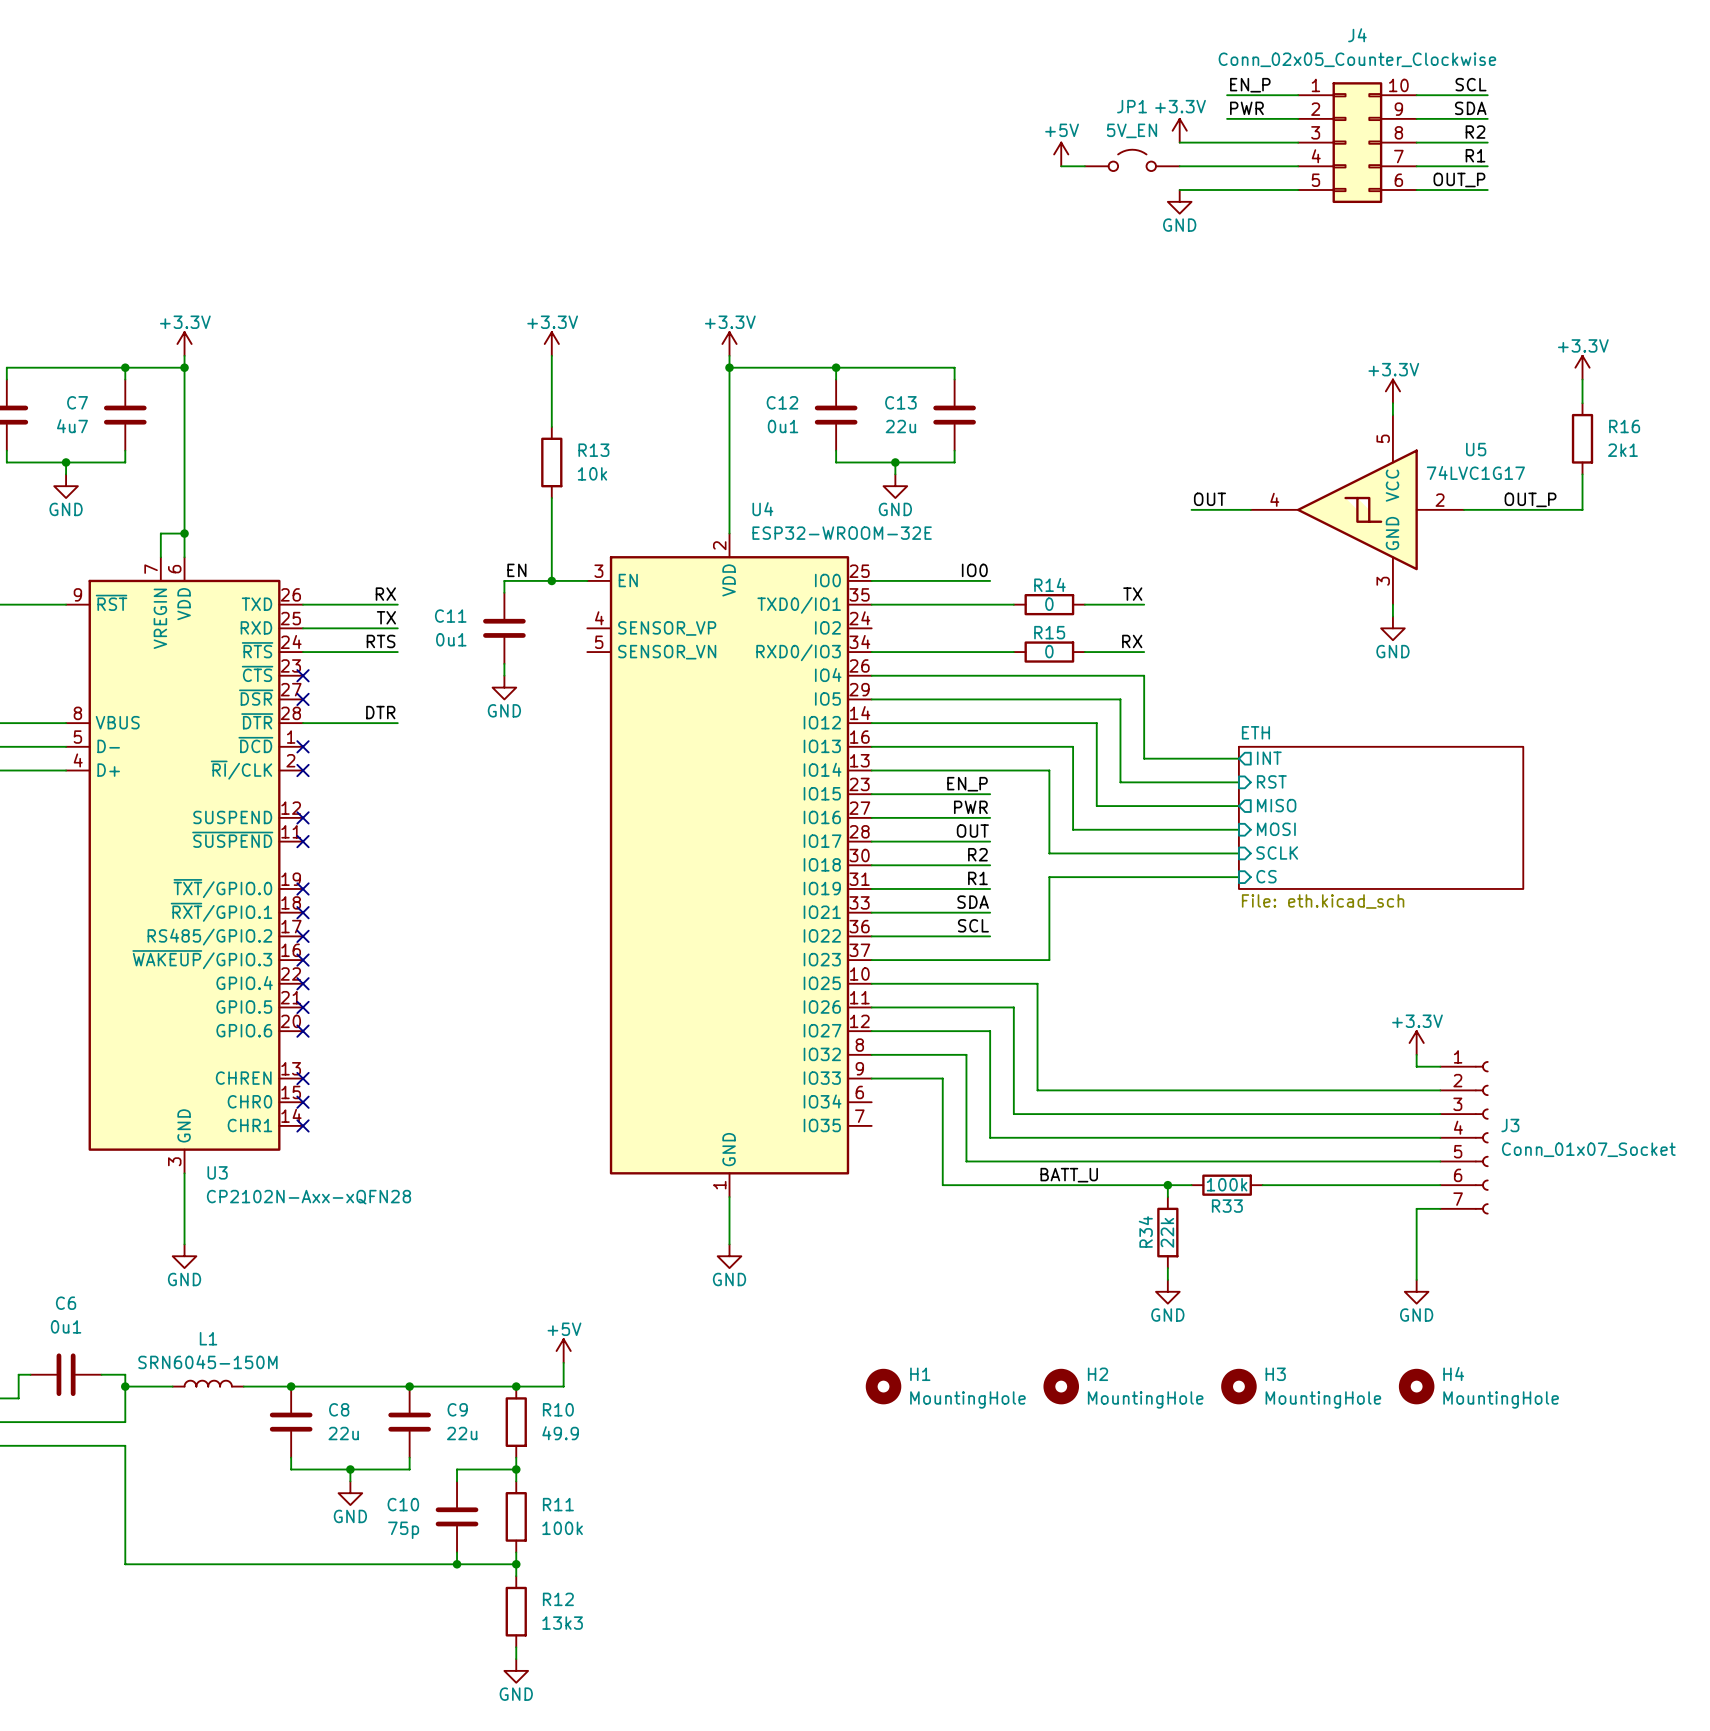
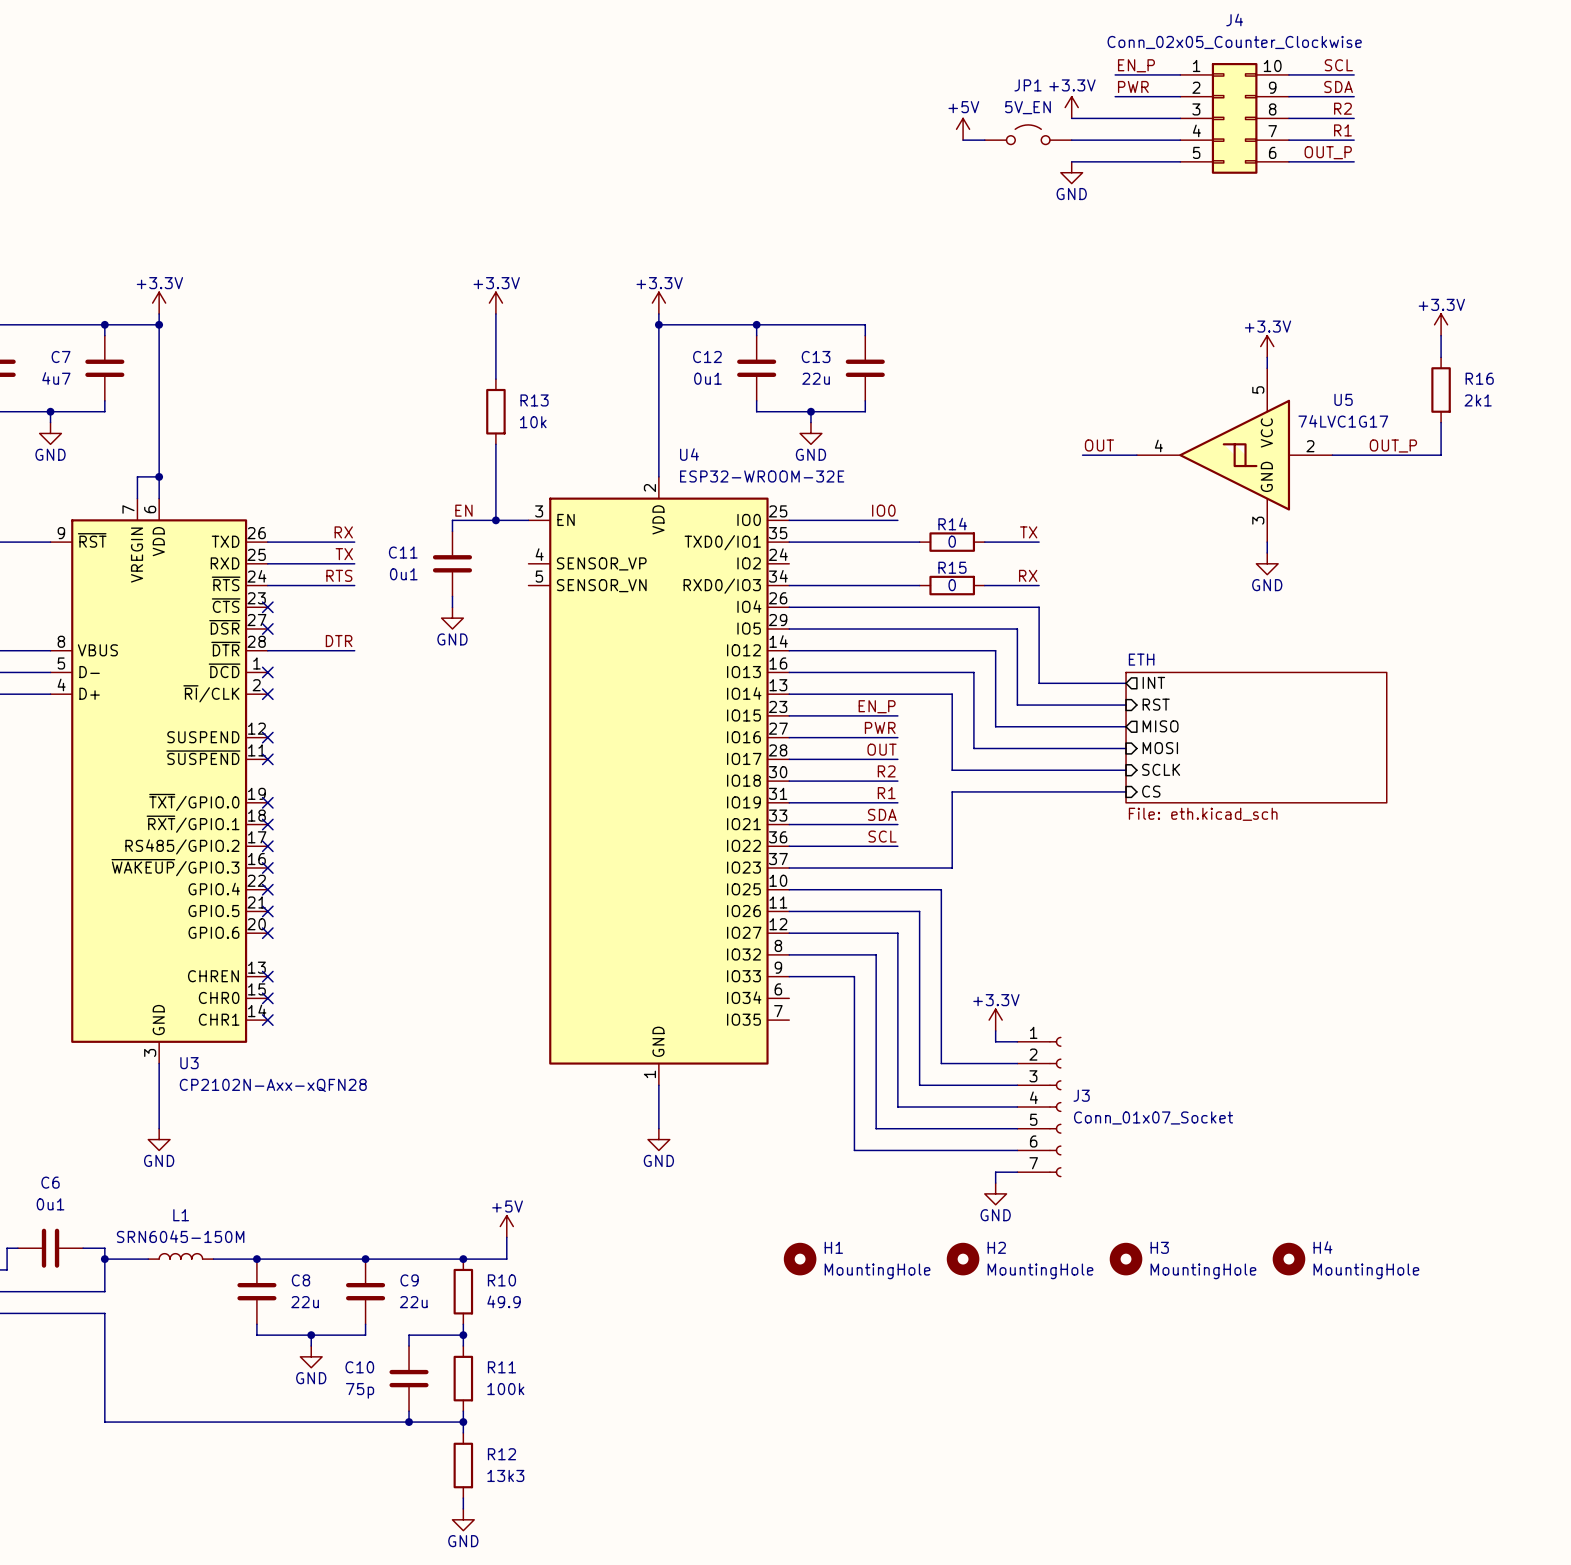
power symbol: +3.3V (1416, 1043) -> none
wire: (1416, 1054) (1416, 1066) (1440, 1066) -> none
wire: (1037, 1090) (1440, 1090) -> (941, 987) (941, 1063) (1017, 1063)
wire: (1013, 1114) (1440, 1114) -> (919, 1009) (919, 1085) (1017, 1085)
power symbol: none -> +3.3V (995, 1020)
wire: (990, 1137) (1440, 1137) -> (897, 1030) (897, 1107) (1017, 1107)
wire: none -> (995, 1030) (995, 1041) (1017, 1041)
J3 position: (1464, 1137) -> (1039, 1107)
wire: (966, 1161) (1440, 1161) -> (876, 1052) (876, 1128) (1017, 1128)
label: BATT_U (1069, 1175) -> none
wire: (942, 1185) (1191, 1185) -> (854, 1074) (854, 1150) (1017, 1150)
wire: (1167, 1185) (1167, 1197) -> none
junction: (1167, 1185) -> none
R33: 100k (1227, 1185) -> none
wire: (1262, 1185) (1440, 1185) -> none
wire: (1440, 1208) (1416, 1208) (1416, 1279) -> none
R34: 22k (1167, 1232) -> none
wire: (1167, 1268) (1167, 1279) -> none
wire: none -> (1017, 1172) (995, 1172) (995, 1183)
power symbol position: GND (1167, 1291) -> GND (995, 1193)
power symbol: GND (1416, 1291) -> none

